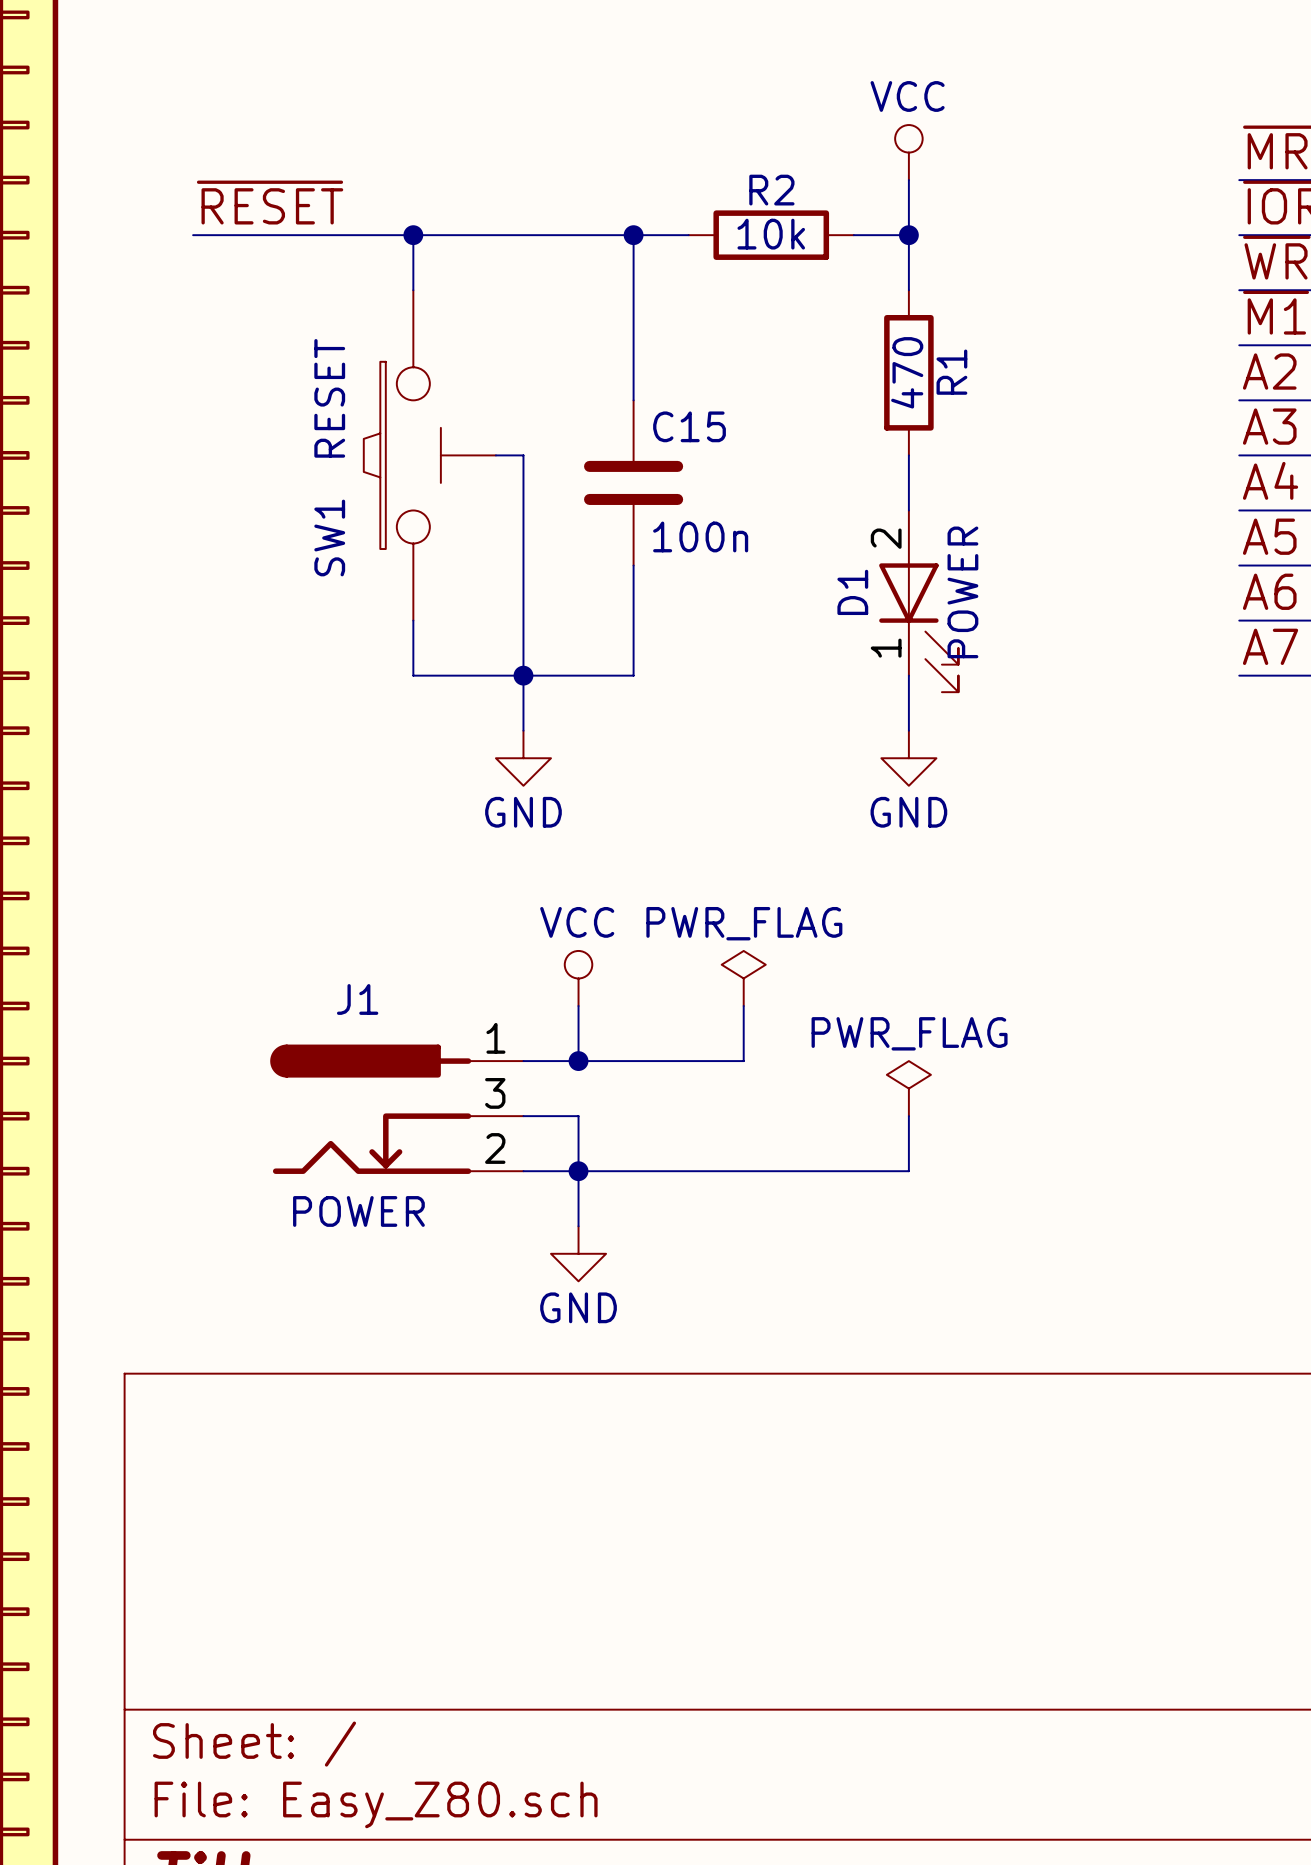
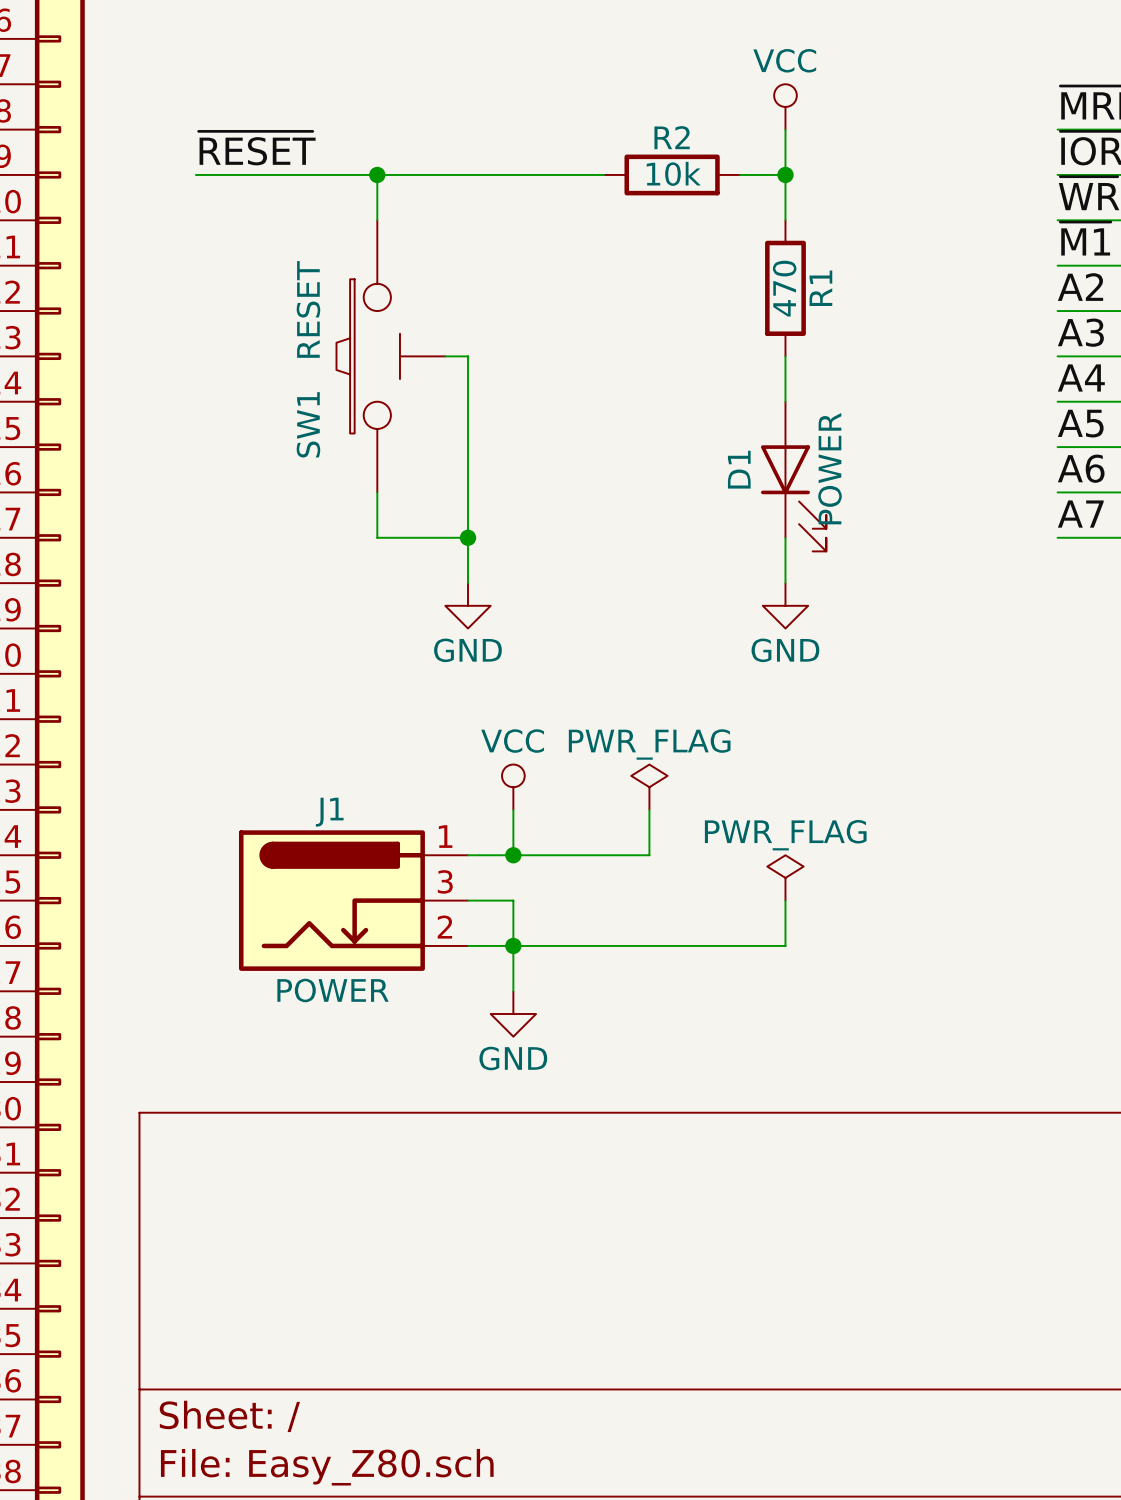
wire: (633, 235) (633, 400) -> none
junction: (633, 235) -> none
C15: 100n (633, 482) -> none
D1 pin number: 2 (886, 538) -> none
wire: (633, 565) (633, 675) (523, 675) -> none
D1 pin number: 1 (886, 648) -> none
J1 symbol: [270, 1044, 524, 1174] -> [238, 830, 469, 971]

